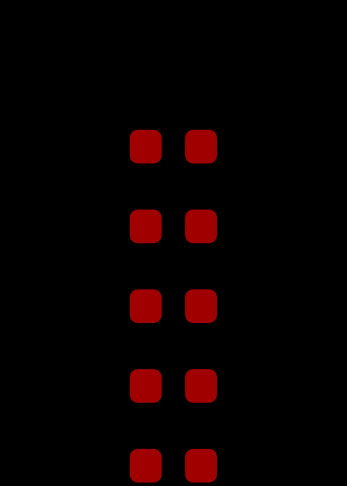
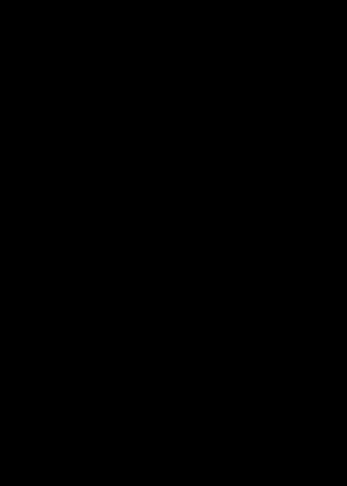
part: (173, 146) -> none
part: (173, 226) -> none
part: (173, 306) -> none
part: (173, 385) -> none
part: (173, 465) -> none

